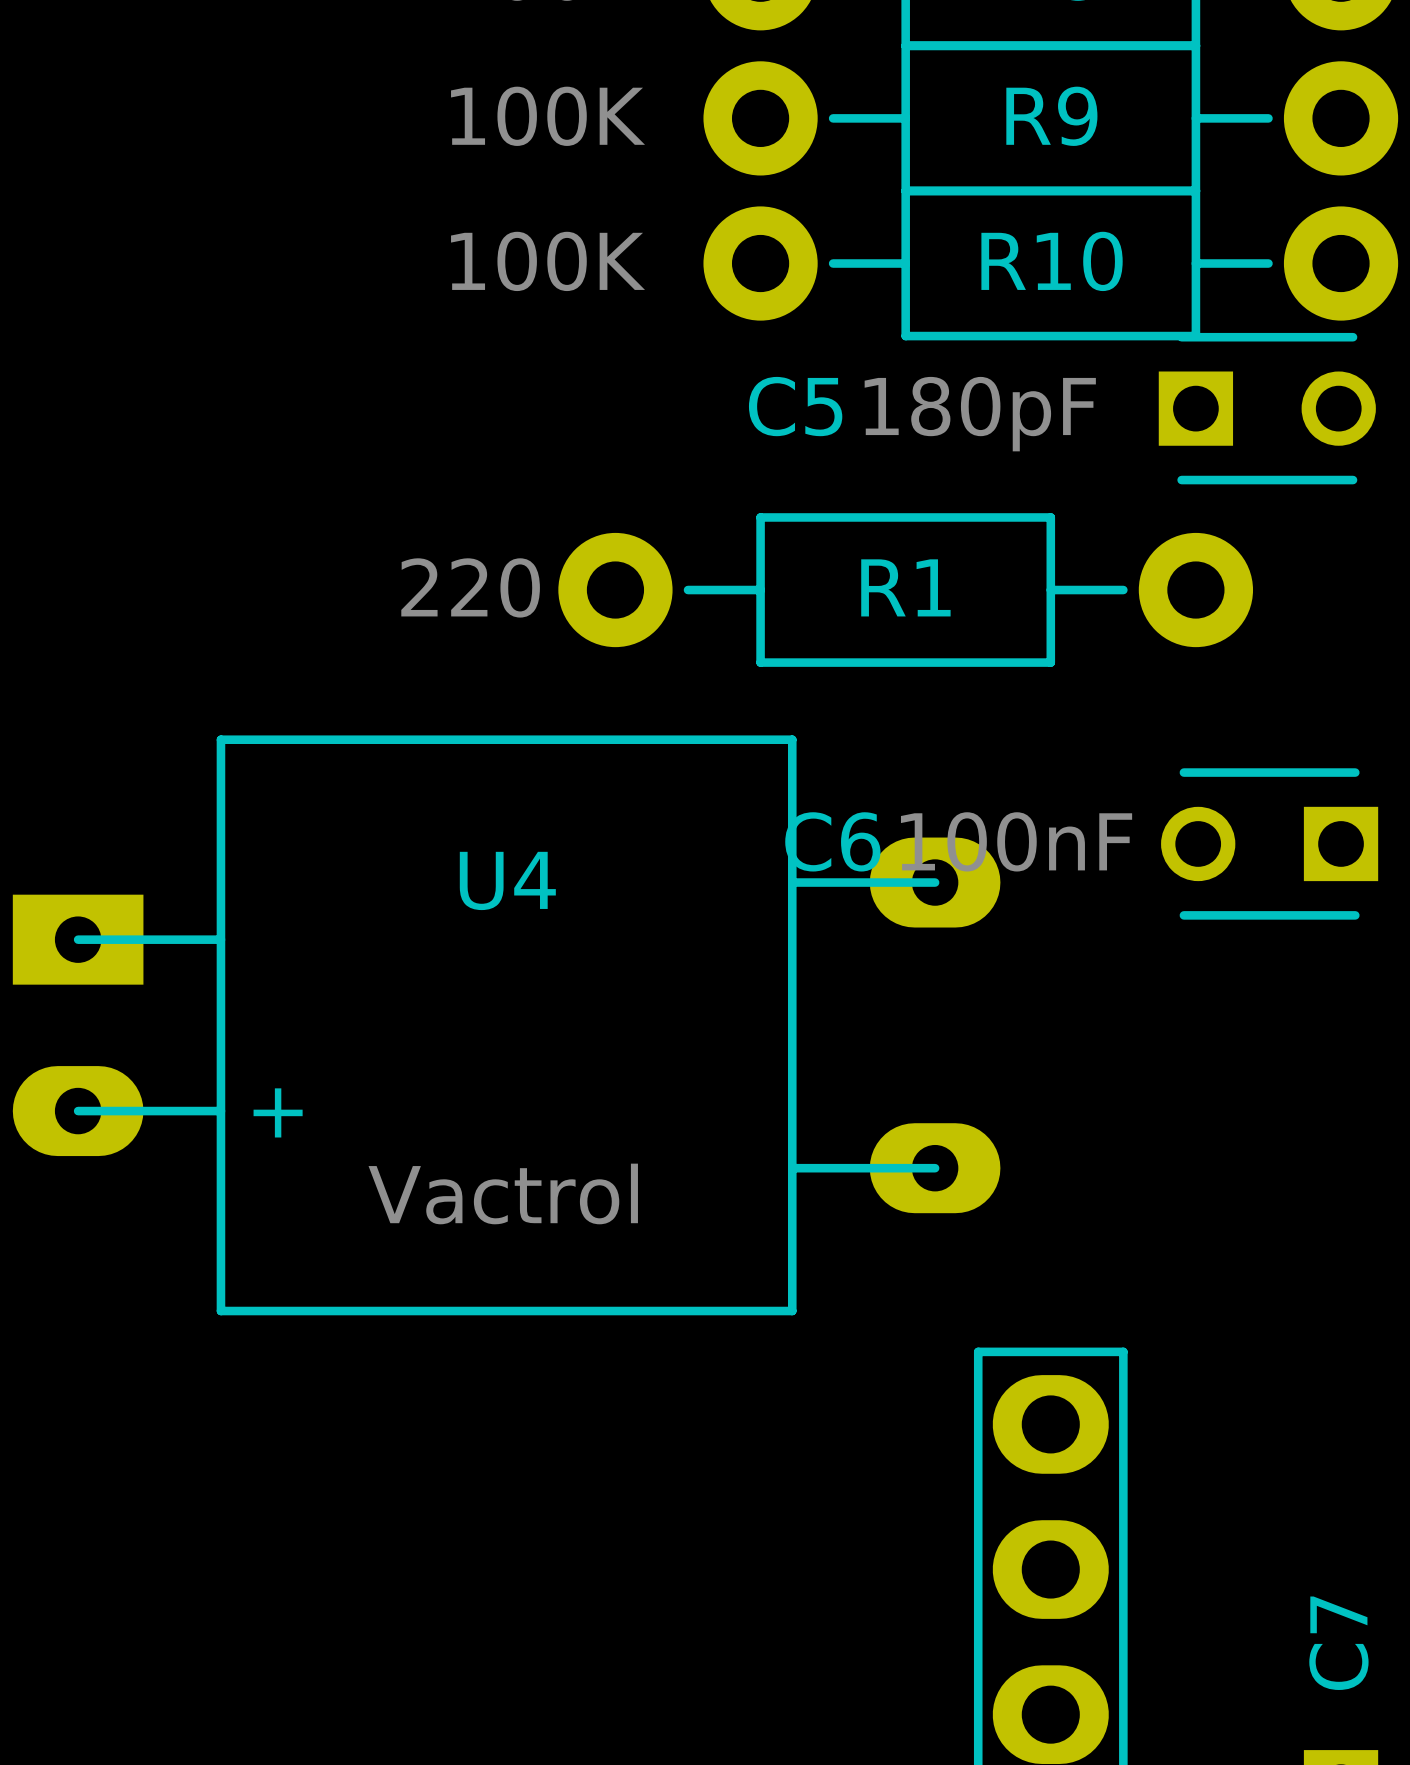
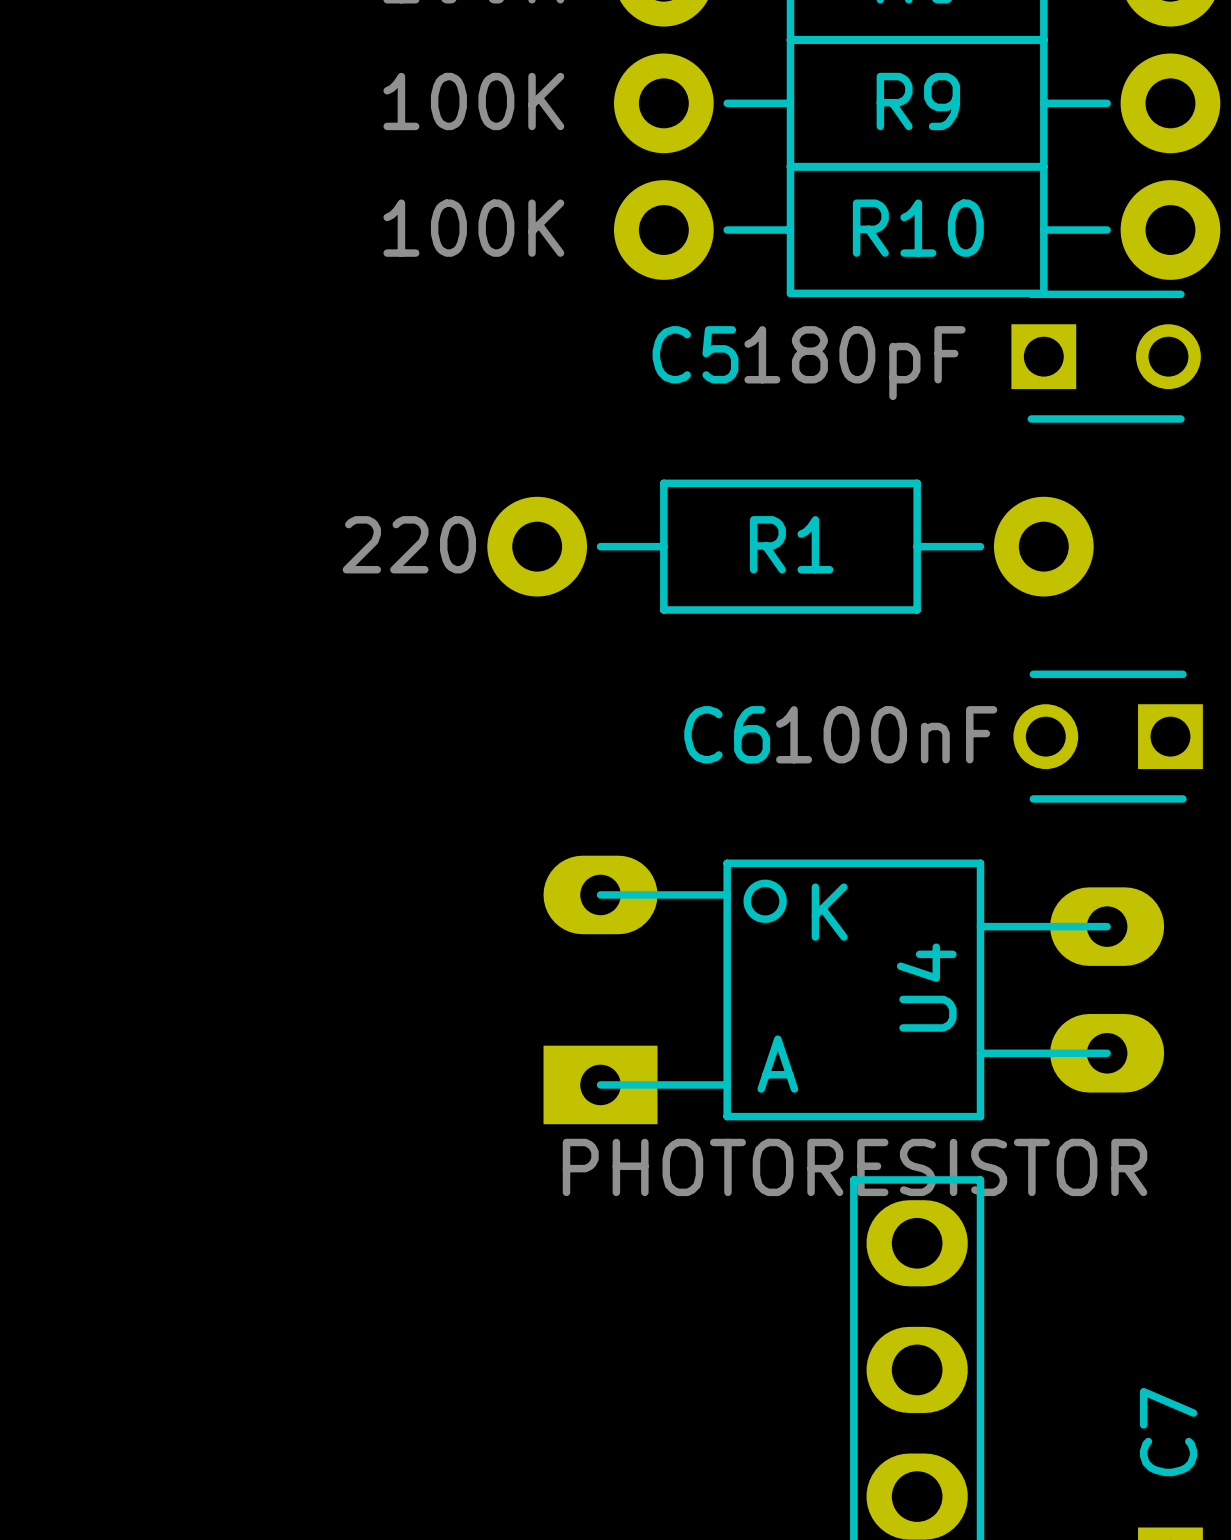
R1 position: (905, 590) -> (790, 546)
U4 footprint: [12, 735, 1001, 1316] -> [543, 855, 1165, 1125]
U4 name position: U4 (507, 880) -> U4 (926, 987)
U4 value: Vactrol (503, 1193) -> PHOTORESISTOR (855, 1167)

